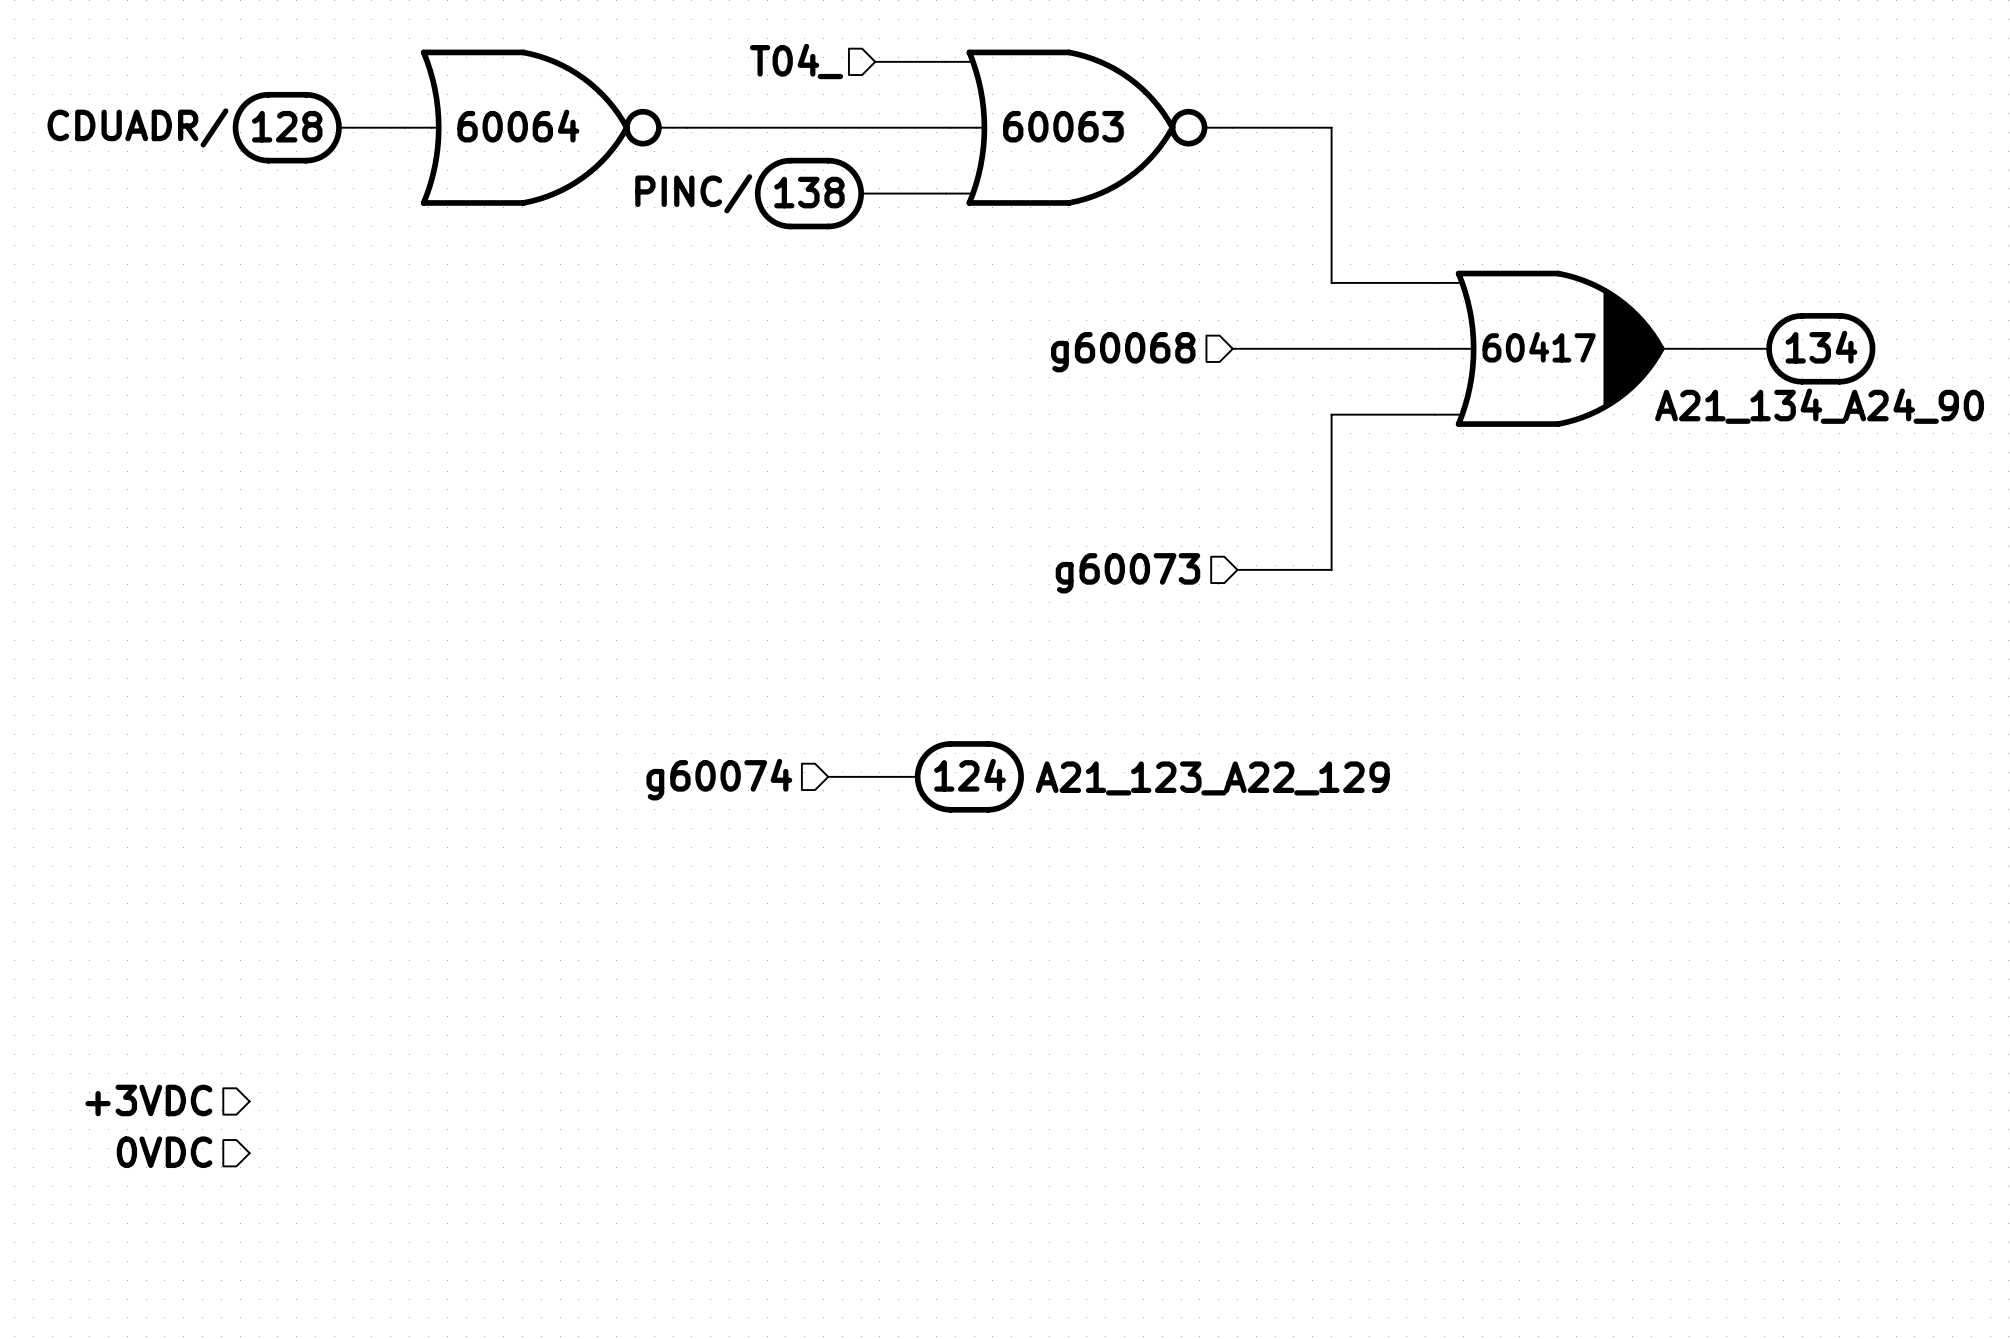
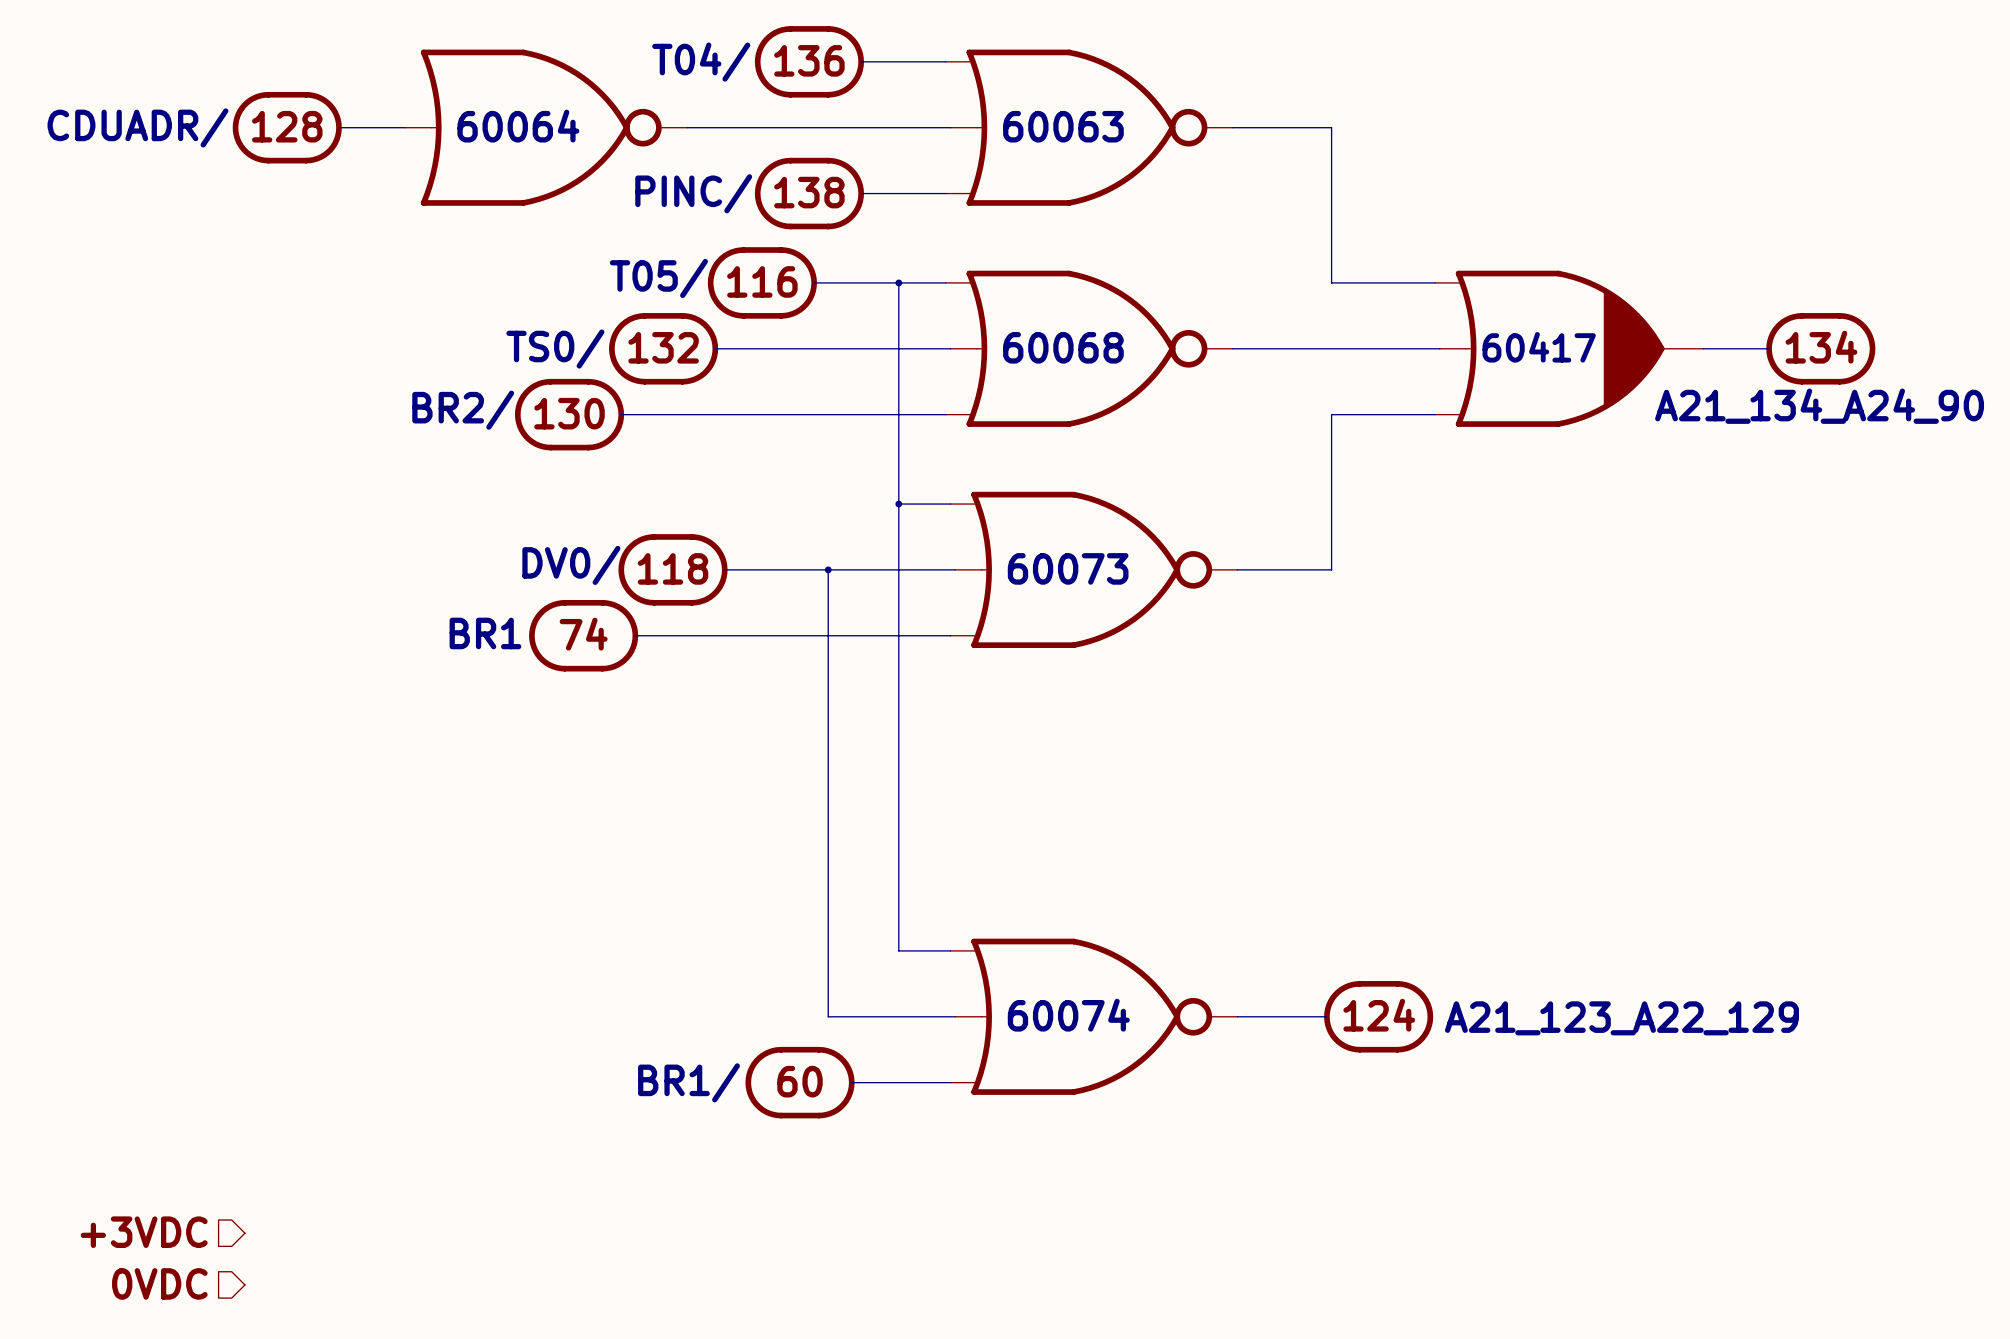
hierarchical label: T04_ (796, 61) -> none
part: none -> (809, 61)
wire: none -> (861, 61) (875, 61)
part: none -> (762, 282)
wire: none -> (814, 282) (945, 282)
wire: none -> (898, 282) (898, 950) (950, 950)
junction: none -> (898, 282)
part: none -> (663, 348)
wire: none -> (715, 348) (950, 348)
part: none -> (1089, 348)
hierarchical label: g60068 (1123, 352) -> none
part: none -> (569, 414)
wire: none -> (621, 414) (945, 414)
wire: none -> (898, 504) (950, 504)
junction: none -> (898, 504)
part: none -> (673, 569)
wire: none -> (724, 569) (955, 569)
wire: none -> (828, 569) (828, 1016) (955, 1016)
junction: none -> (828, 569)
part: none -> (1094, 569)
hierarchical label: g60073 (1127, 573) -> none
part: none -> (583, 635)
wire: none -> (635, 635) (950, 635)
wire: (828, 776) (917, 776) -> none
part: (969, 776) -> none
hierarchical label: g60074 (719, 779) -> none
part: none -> (1094, 1016)
wire: none -> (1237, 1016) (1326, 1016)
part: none -> (1378, 1016)
part: none -> (800, 1082)
wire: none -> (851, 1082) (950, 1082)
hierarchical label position: +3VDC (148, 1100) -> +3VDC (144, 1232)
hierarchical label position: 0VDC (164, 1152) -> 0VDC (159, 1283)

